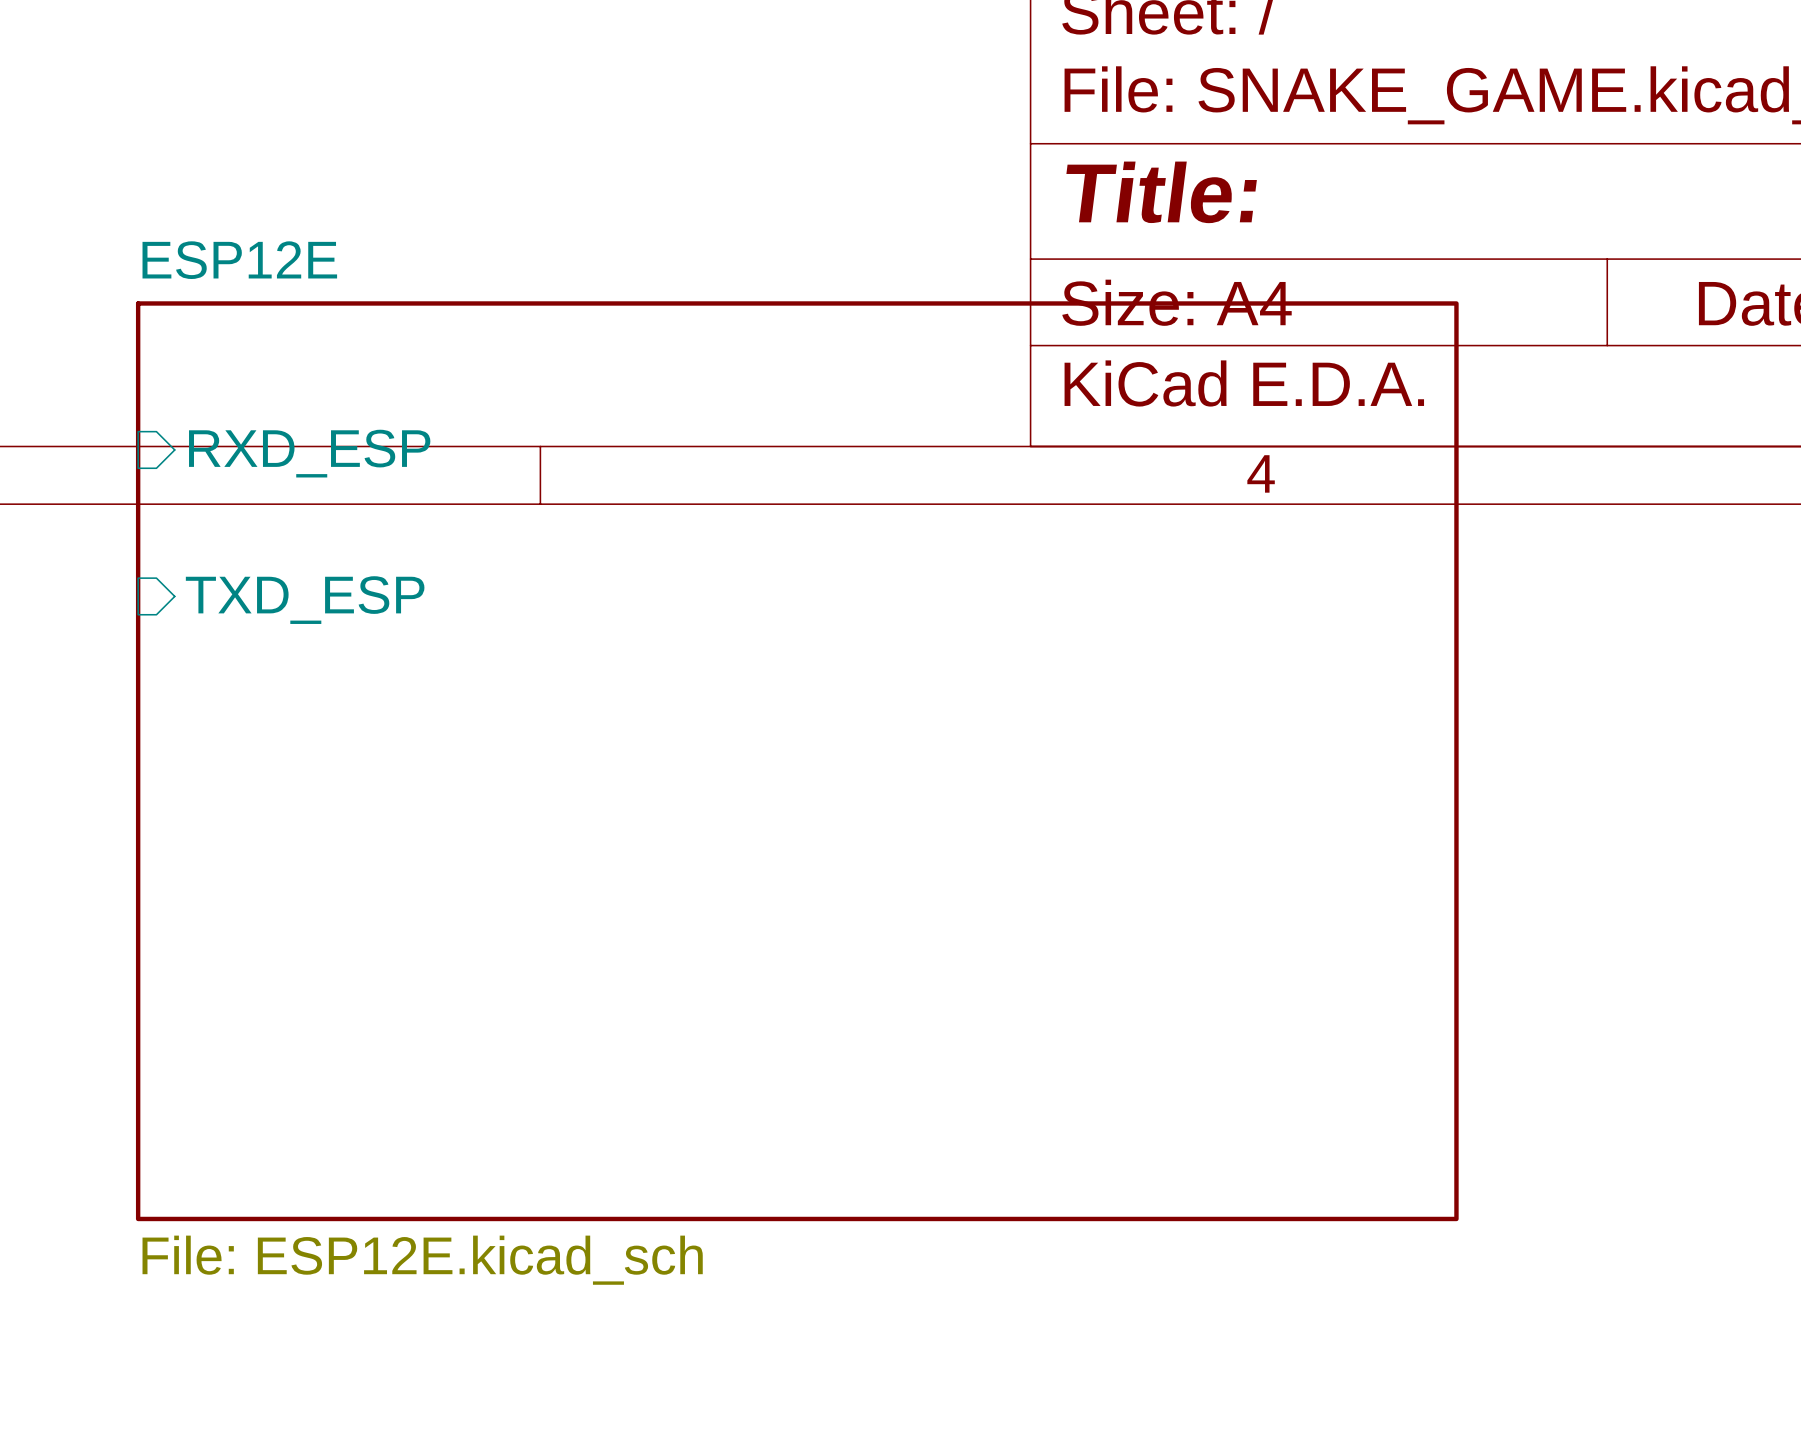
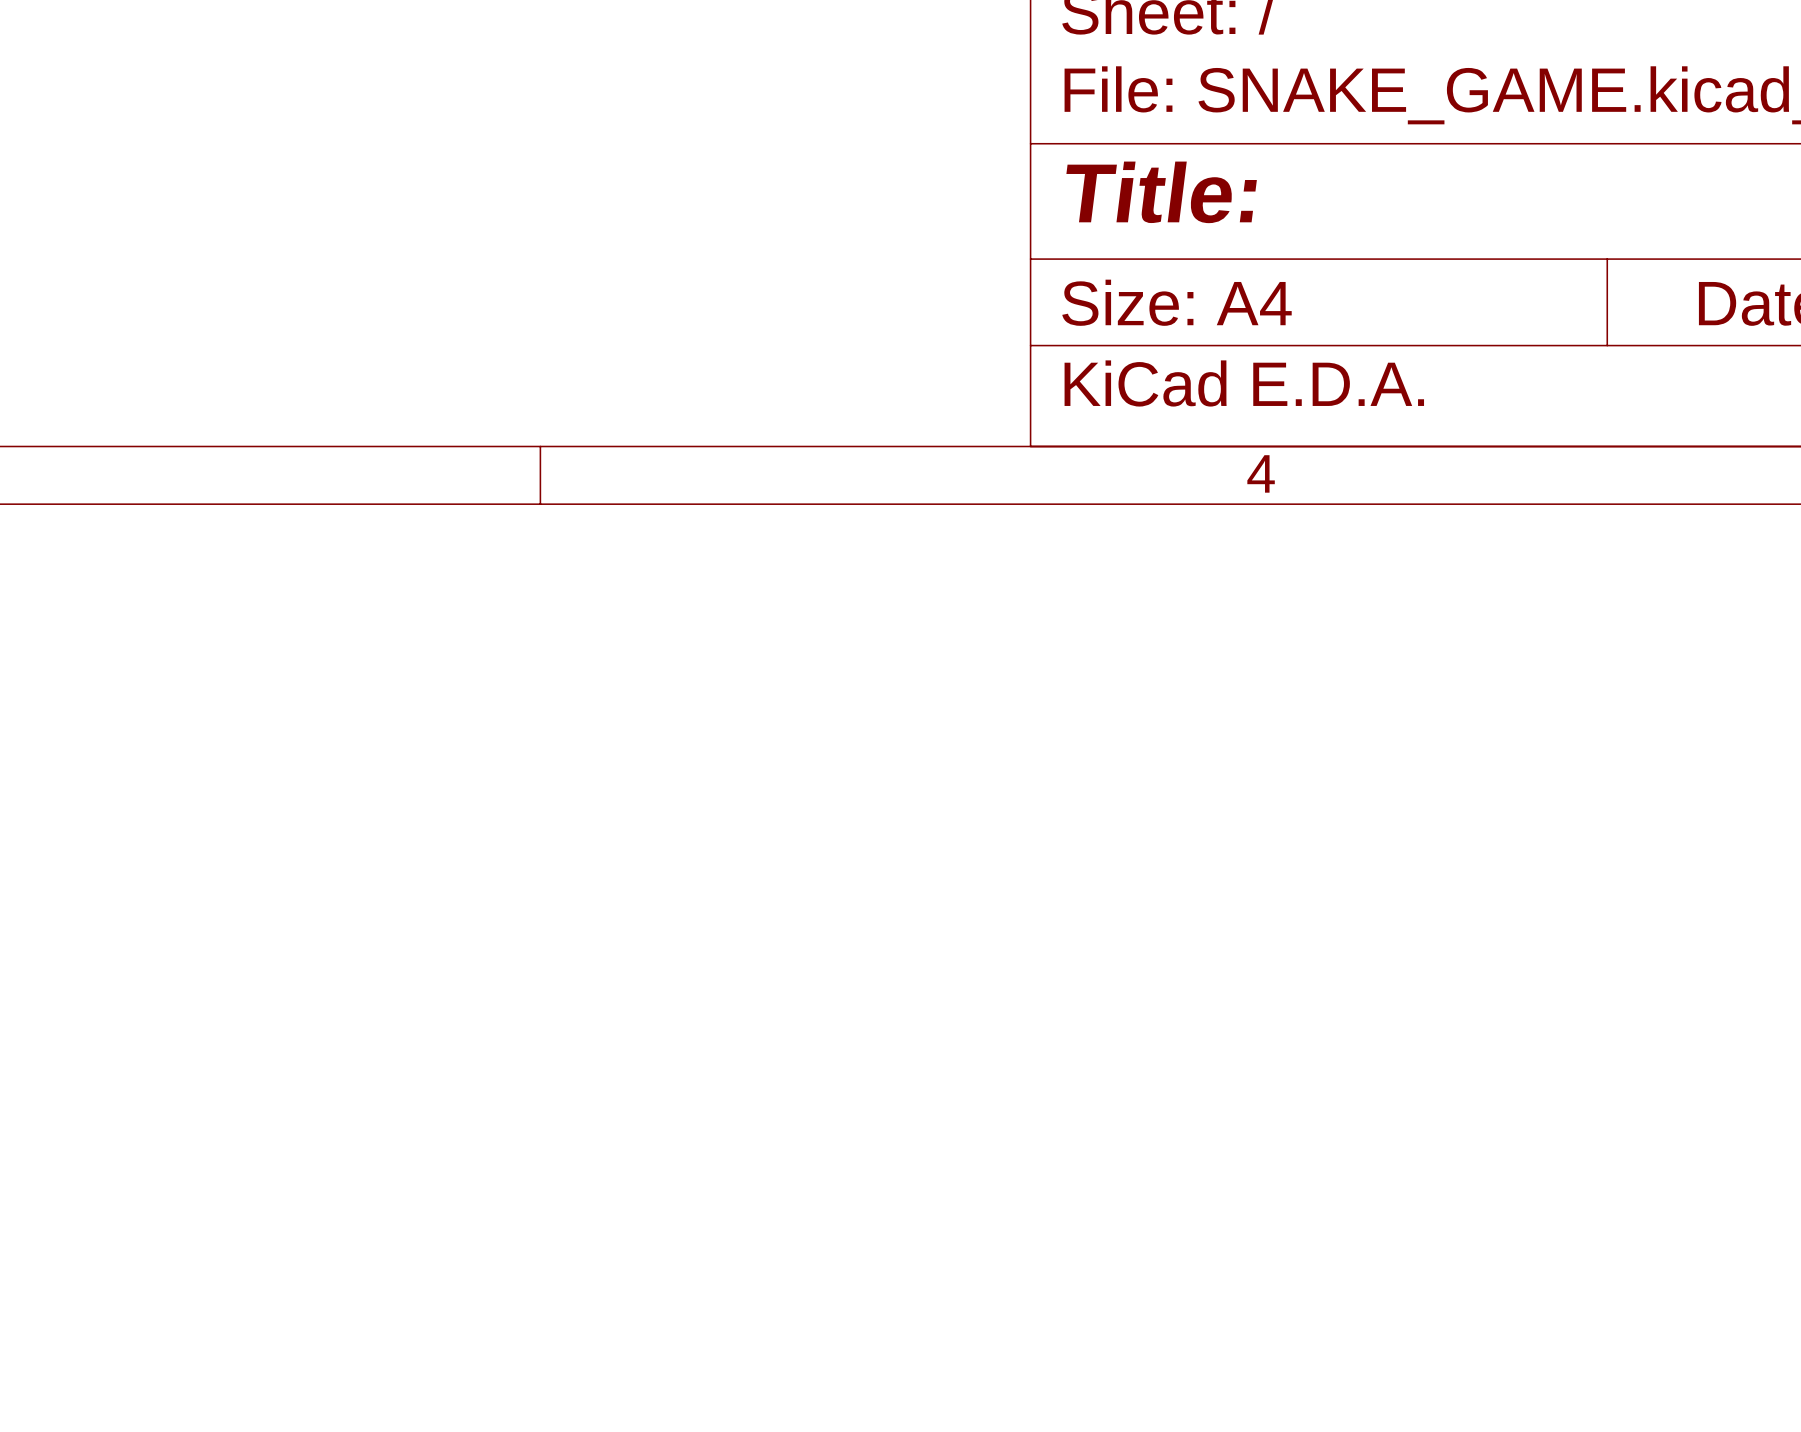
sheet pin: RXD_ESP (309, 453) -> none
sheet pin: TXD_ESP (305, 600) -> none
sheet ESP12E: File: ESP12E.kicad_sch (797, 761) -> none

